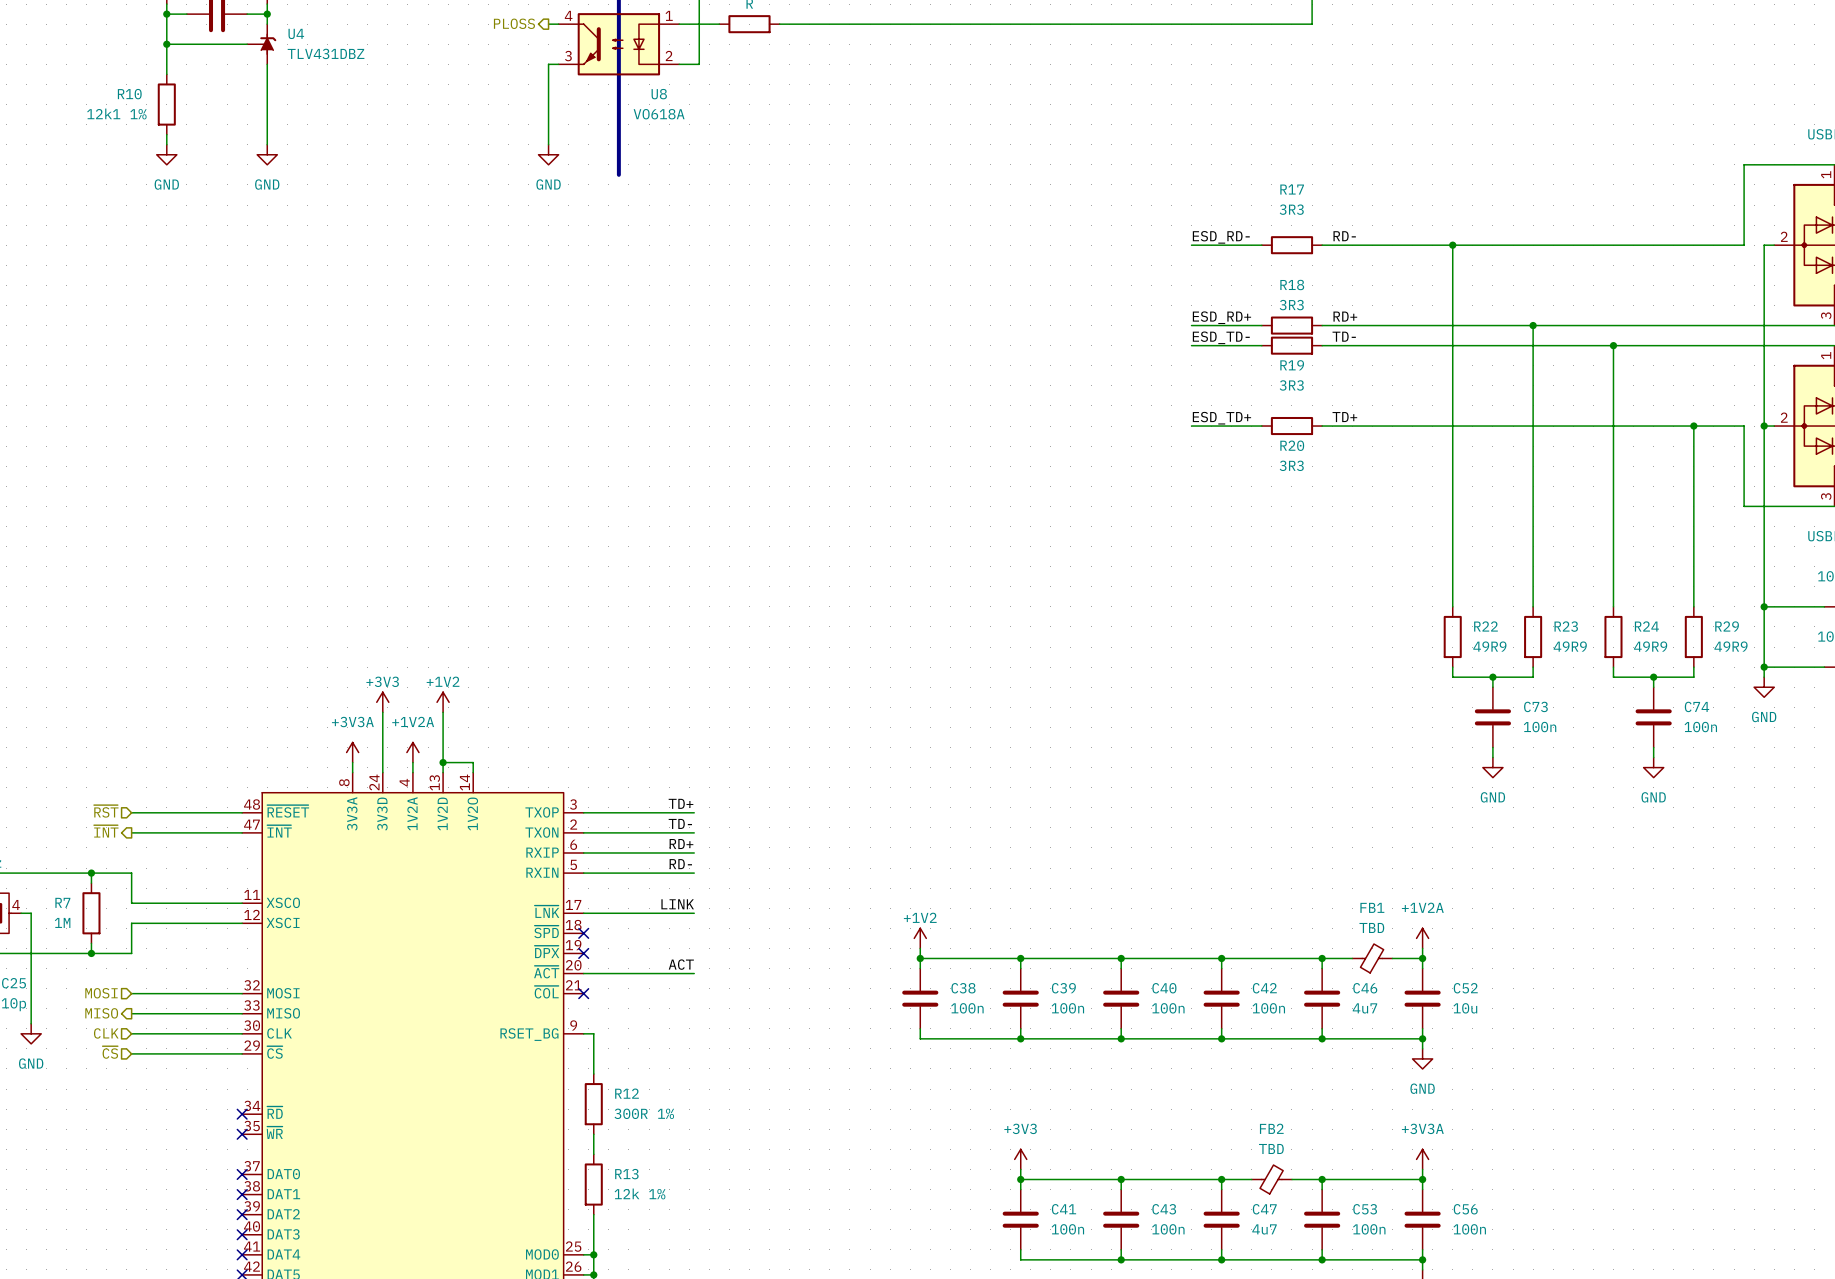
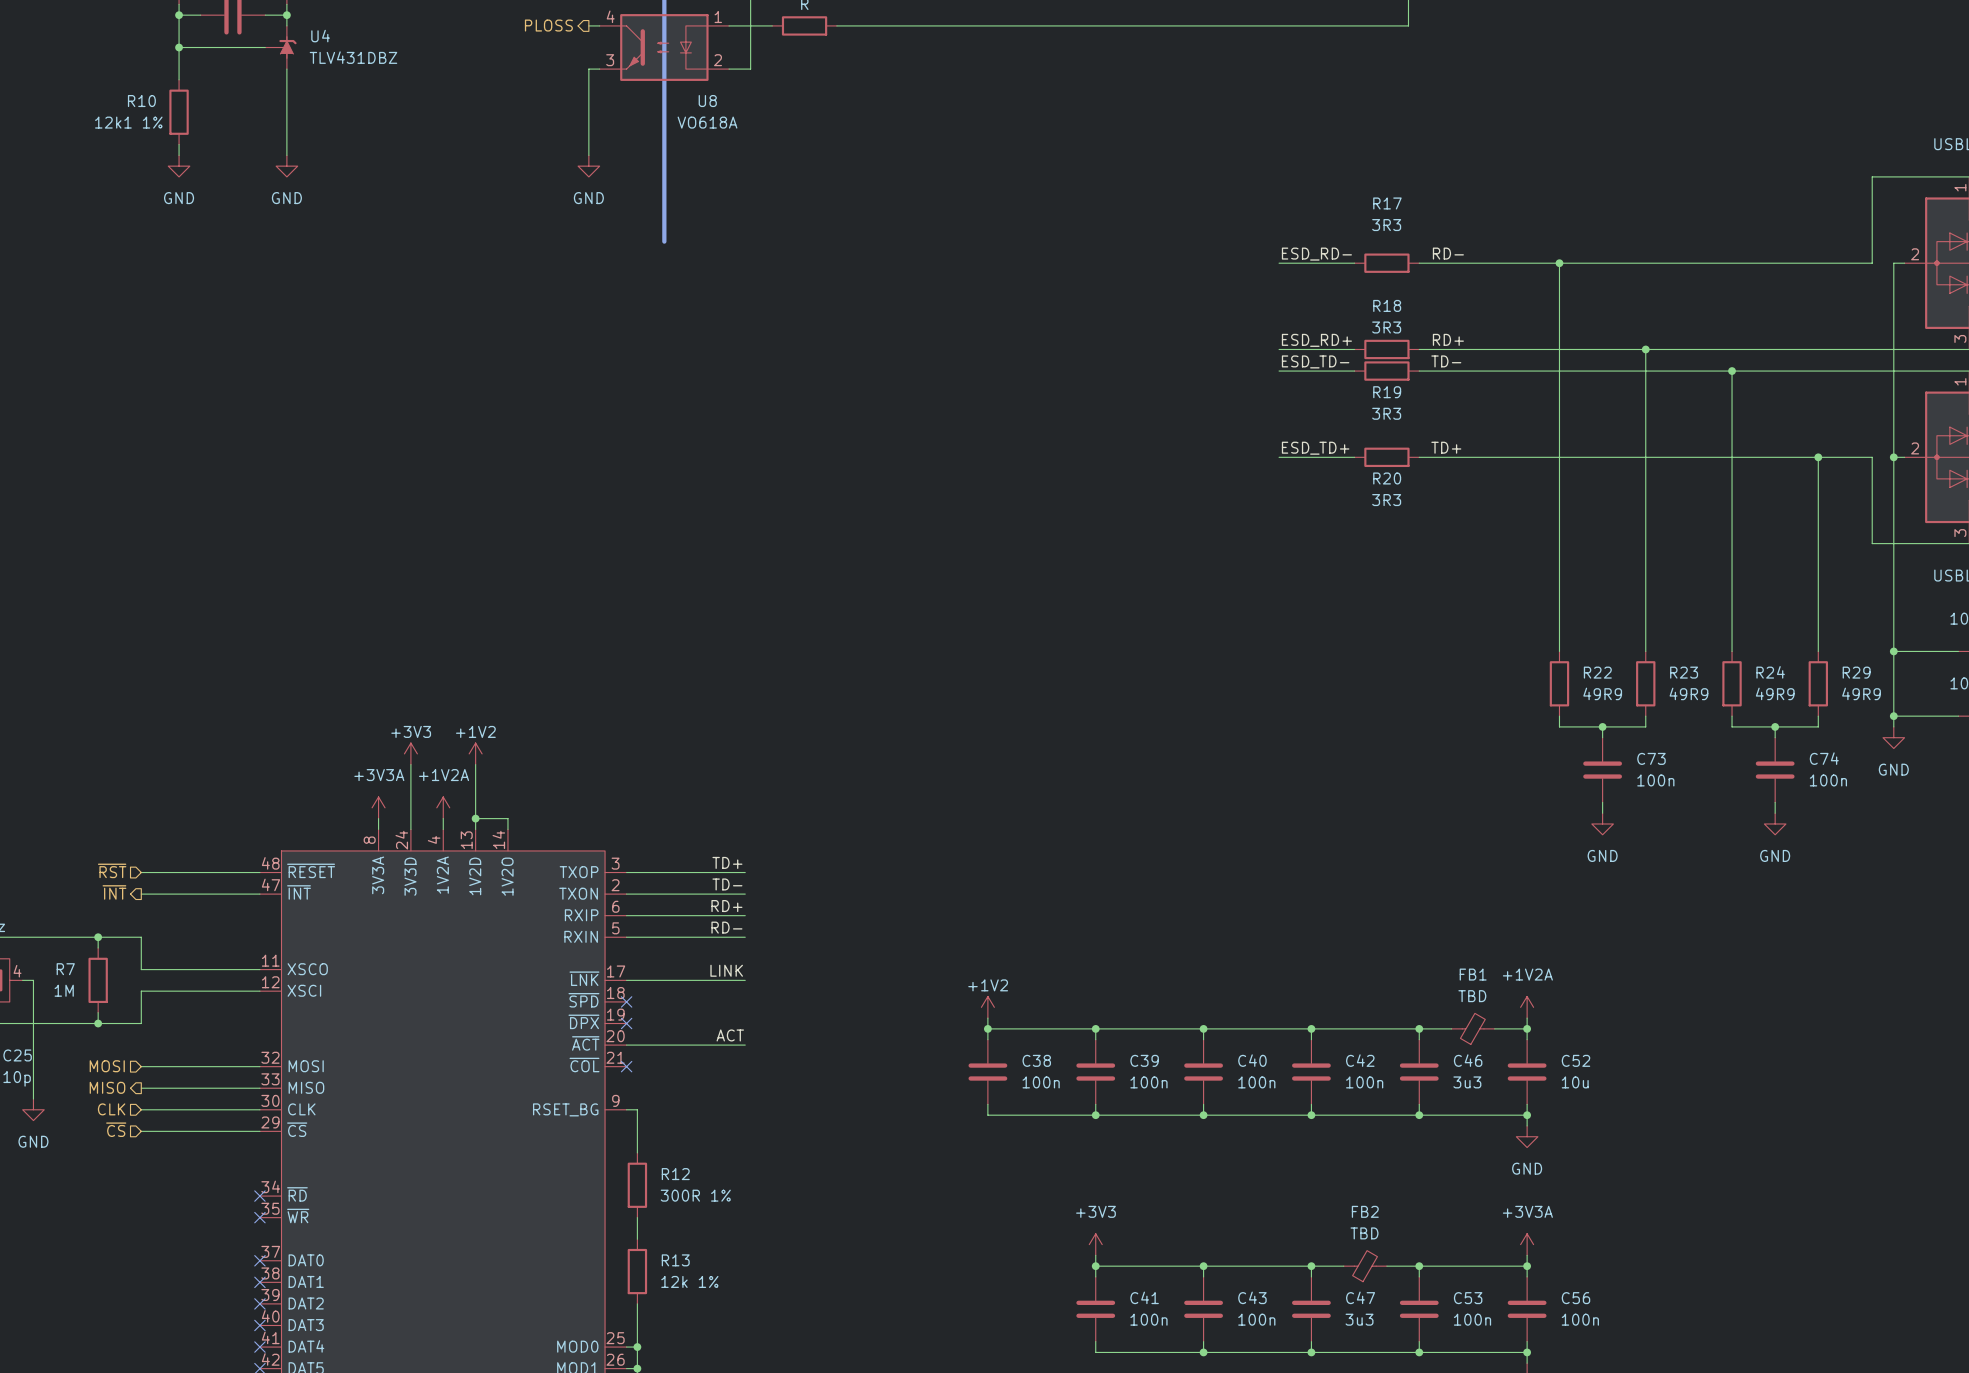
line: none -> (664, 187) (664, 241)
C46 value: 4u7 (1364, 1008) -> 3u3 (1467, 1082)
C47 value: 4u7 (1264, 1229) -> 3u3 (1359, 1319)

